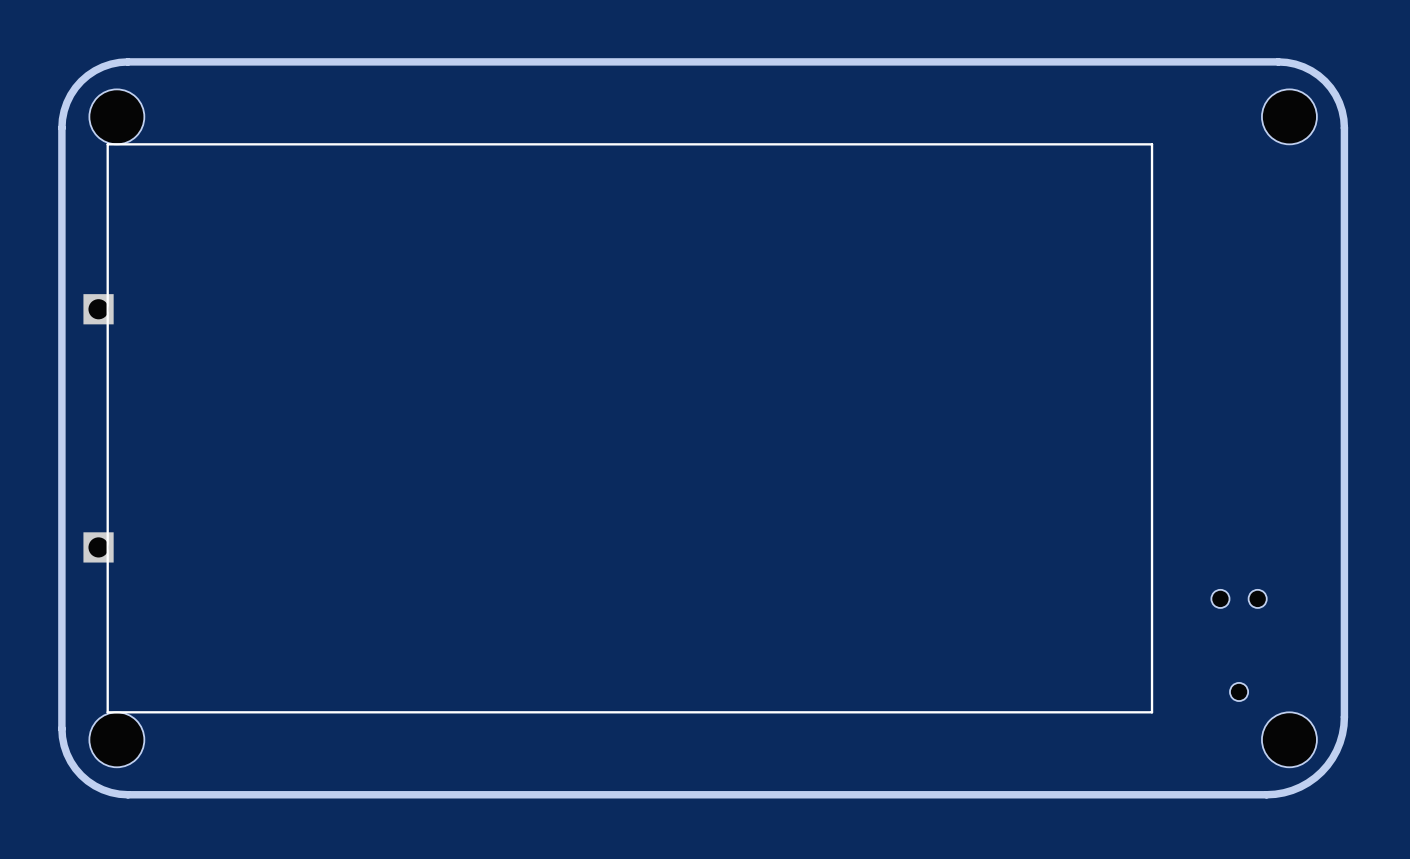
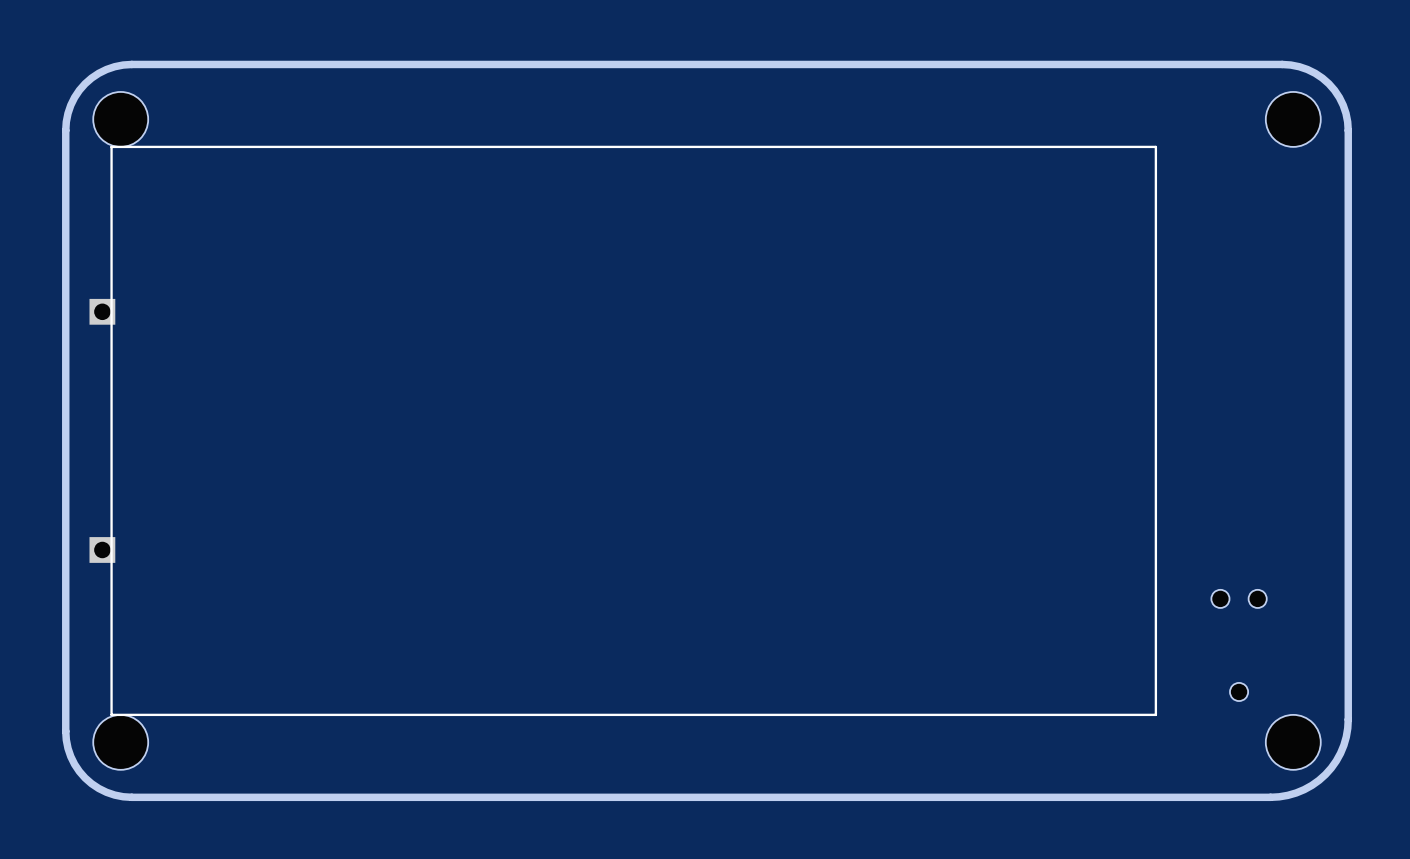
part footprint: [58, 58, 1349, 799] -> [62, 60, 1352, 802]

